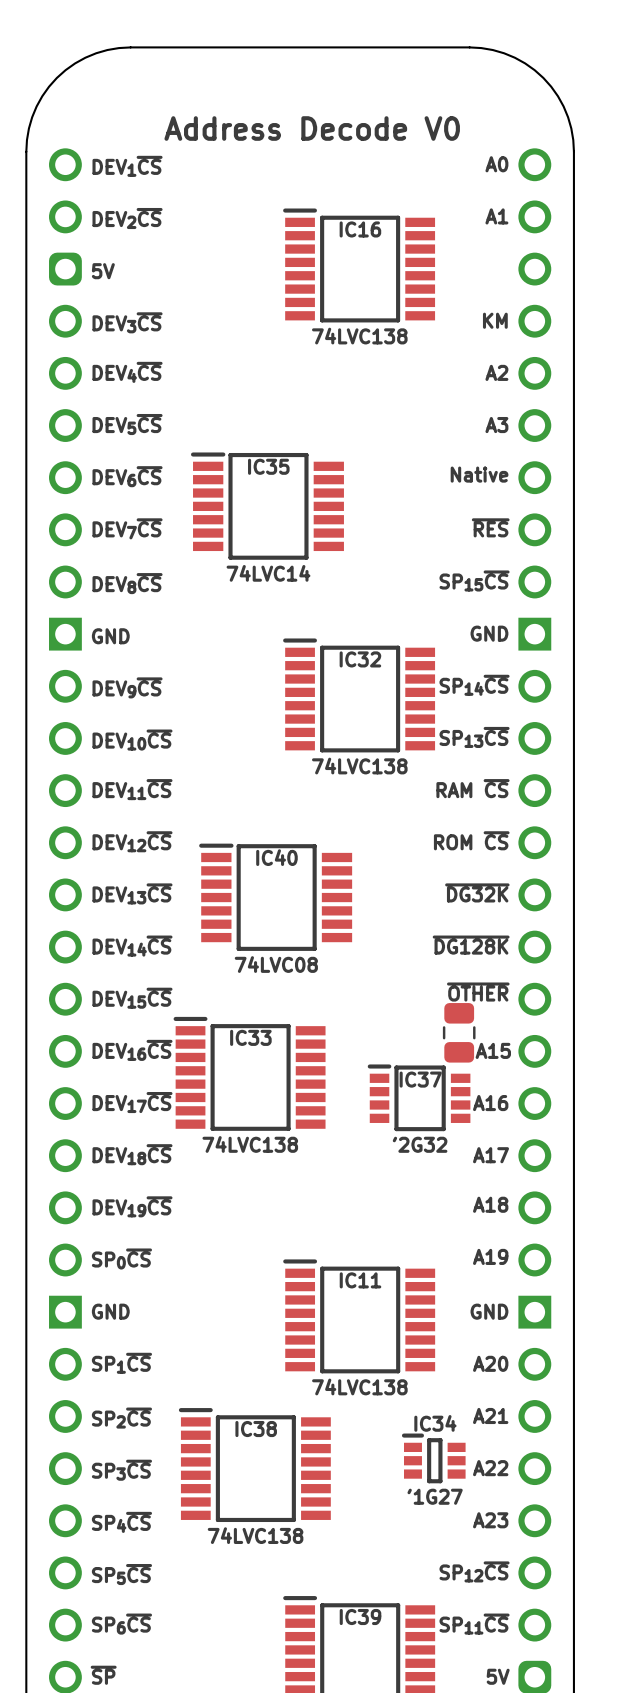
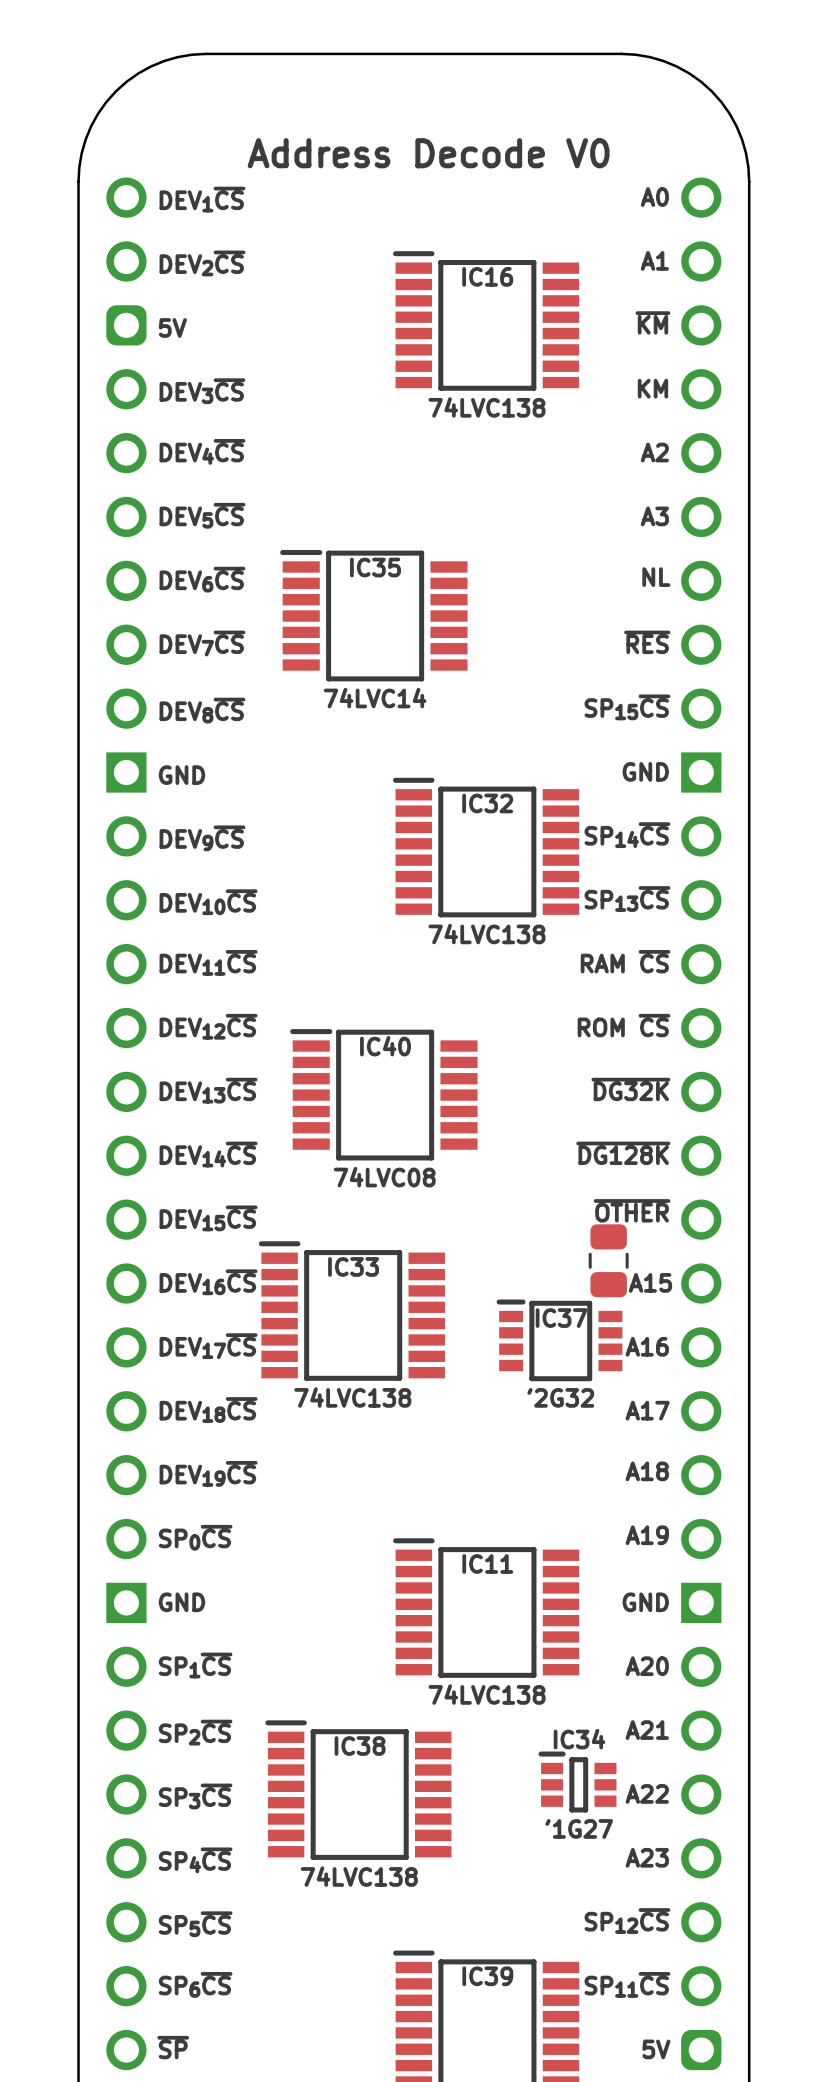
text: none -> ~{KM} (652, 322)
text: Native (479, 474) -> NL (656, 577)

